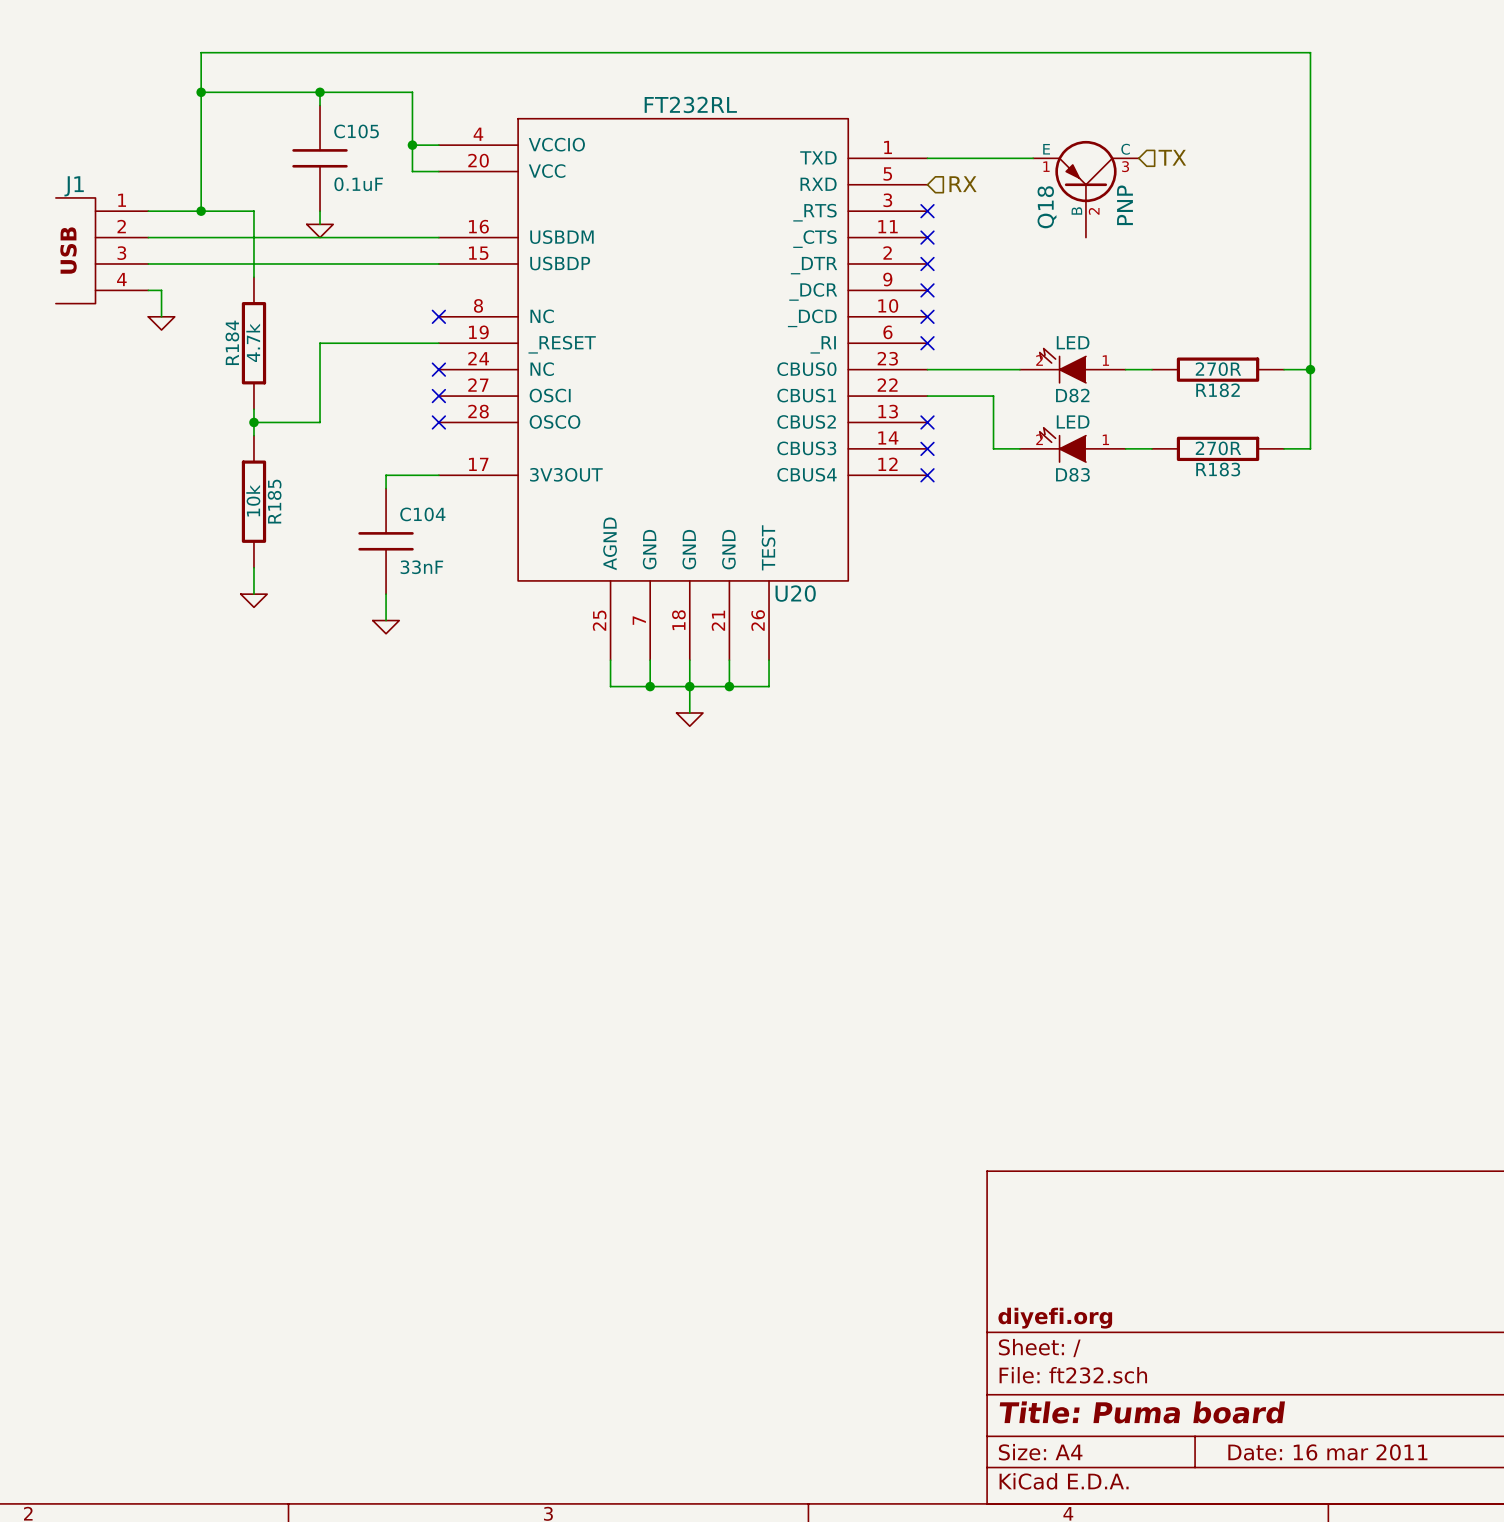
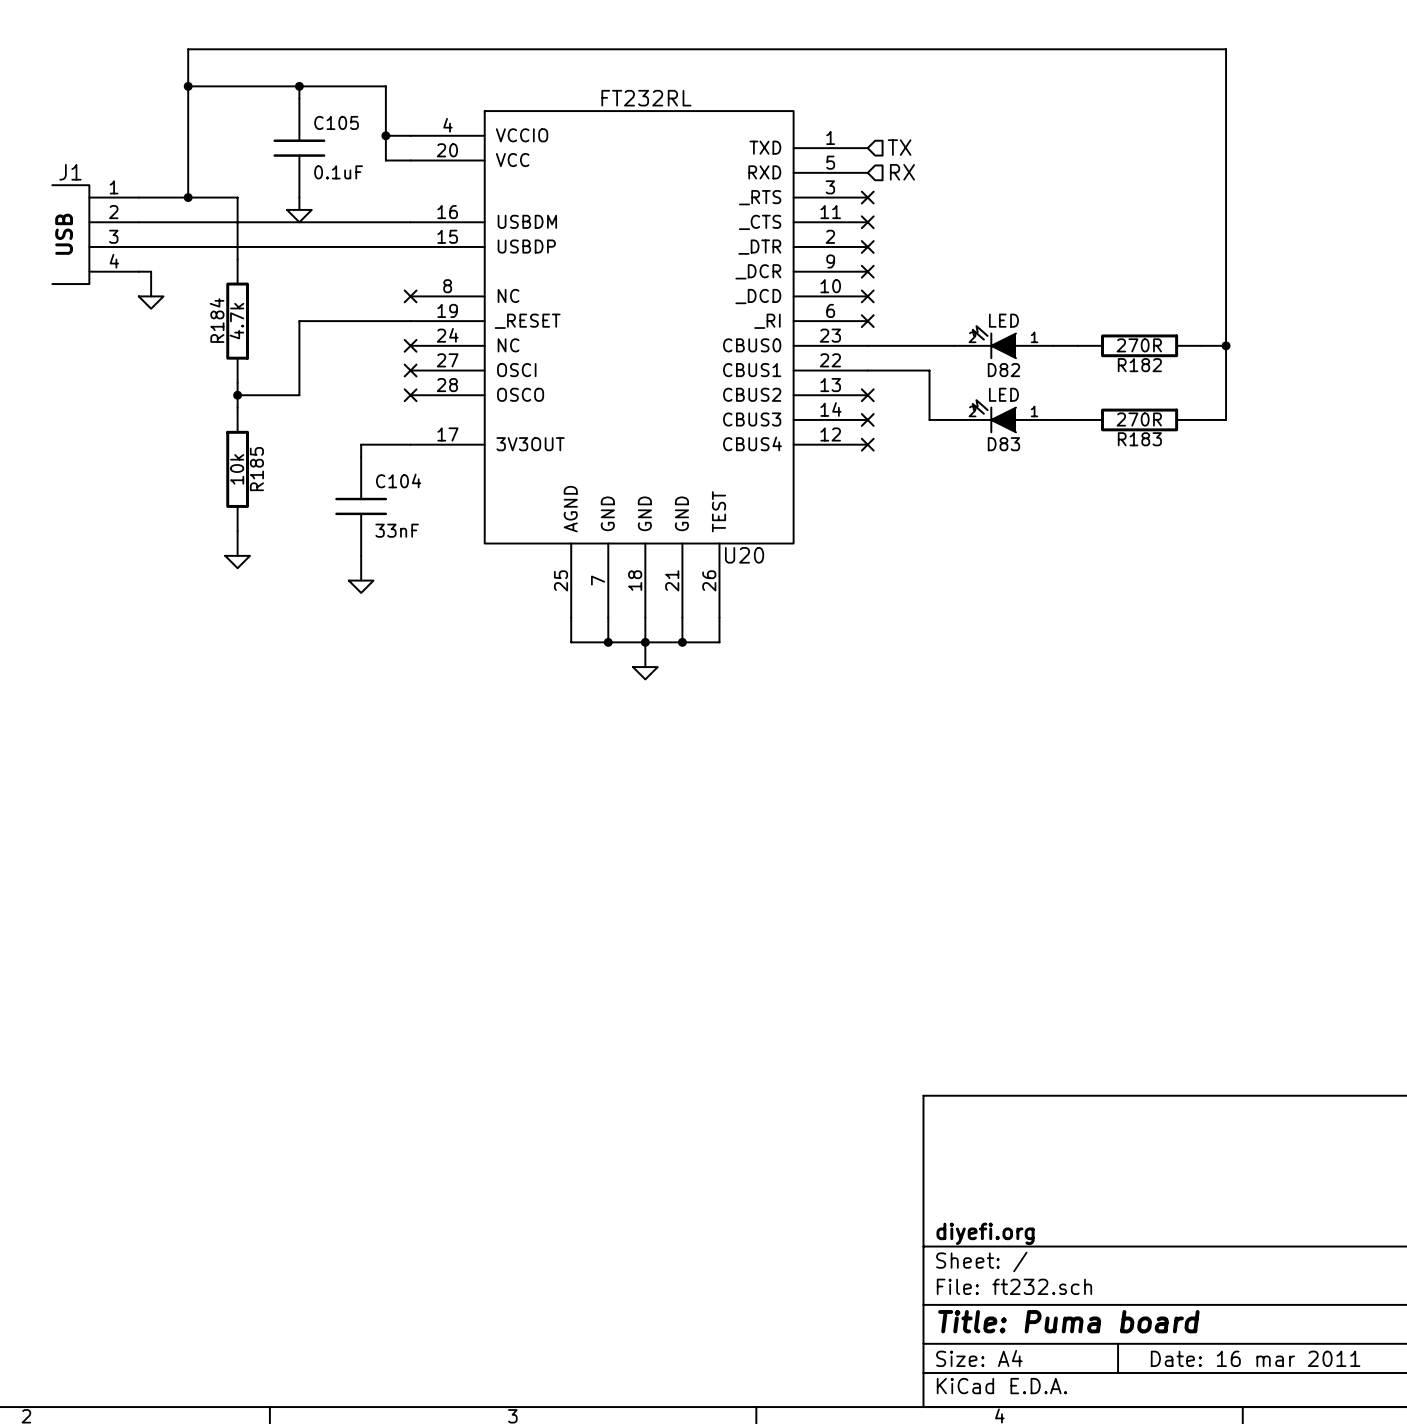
hierarchical label position: TX (1172, 157) -> TX (899, 147)
wire: (927, 158) (1033, 158) -> none
Q18: PNP (1085, 189) -> none

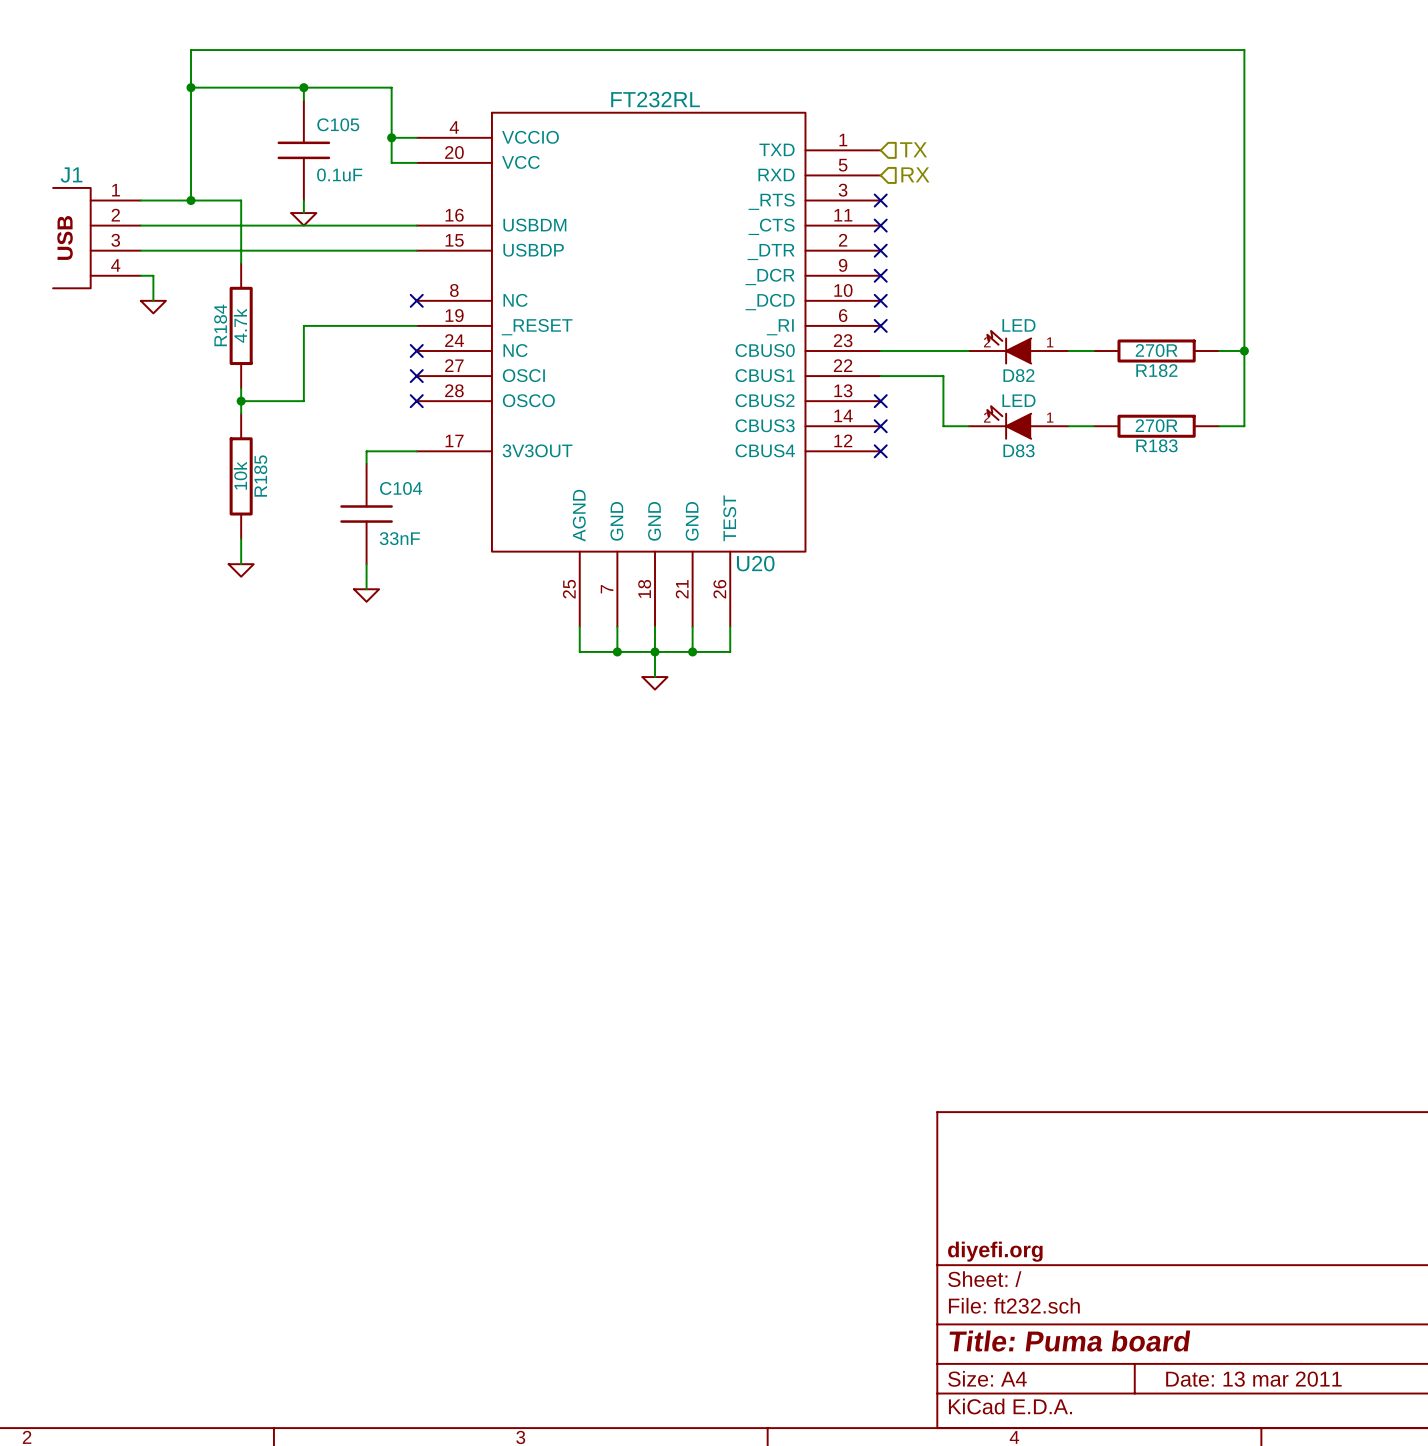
title block: Date: 16 mar 2011 (1255, 1358) -> Date: 13 mar 2011 (1253, 1379)

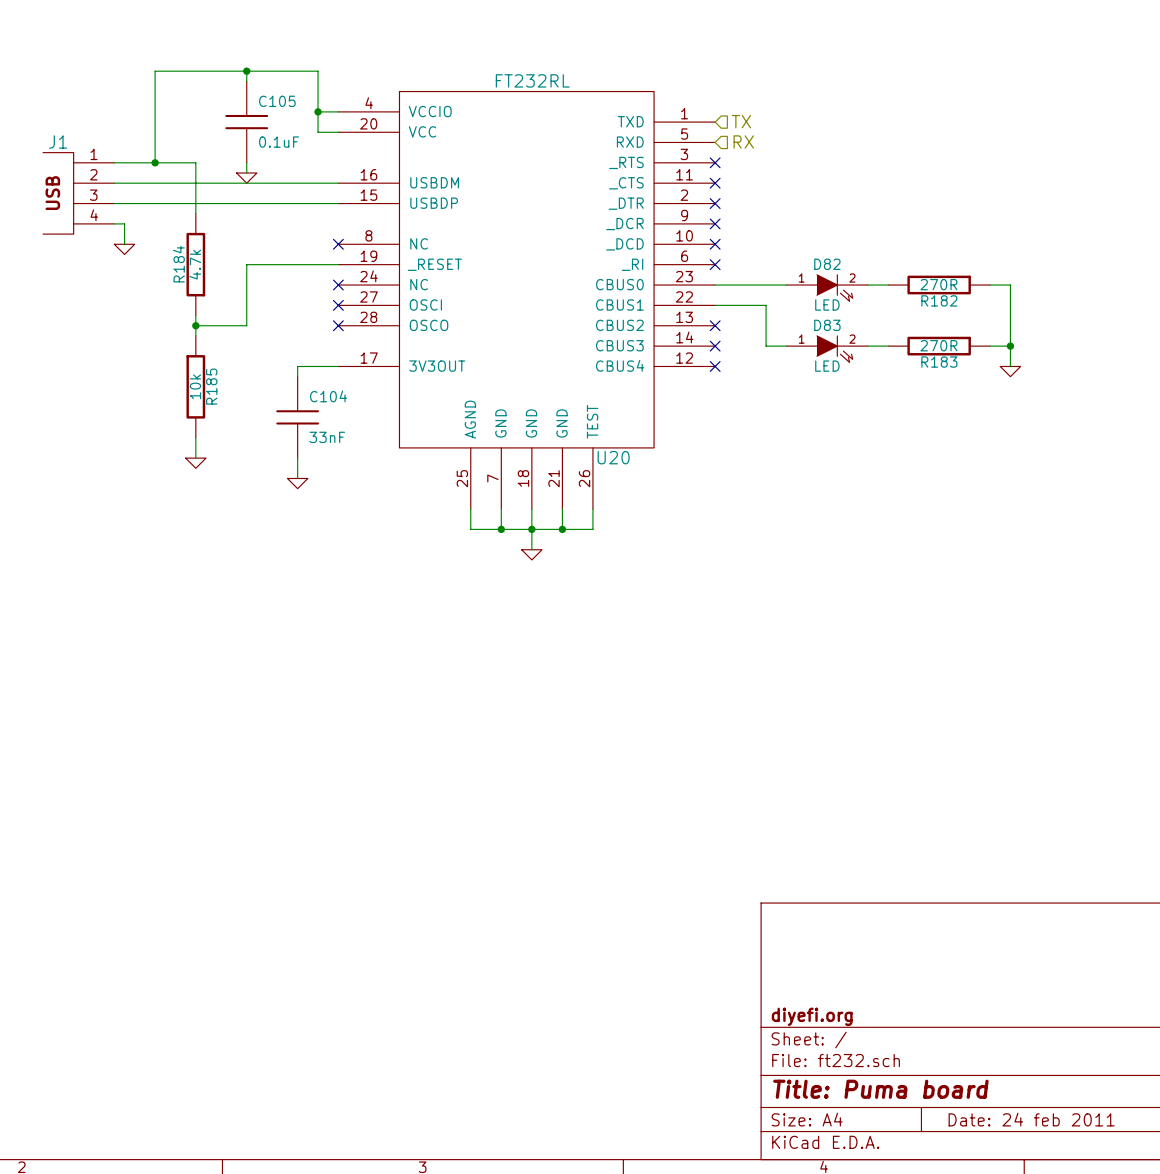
wire: (191, 87) (191, 50) (1244, 50) (1244, 351) -> none
junction: (191, 87) -> none
D82 rotation: 0° (1009, 347) -> 180° (834, 288)
junction: (1244, 351) -> none
D83 rotation: 0° (1009, 422) -> 180° (834, 349)
wire: none -> (1010, 346) (1010, 366)
junction: none -> (1010, 346)
power symbol: none -> (1010, 371)
title block: Date: 13 mar 2011 (1253, 1379) -> Date: 24 feb 2011 (1031, 1119)

